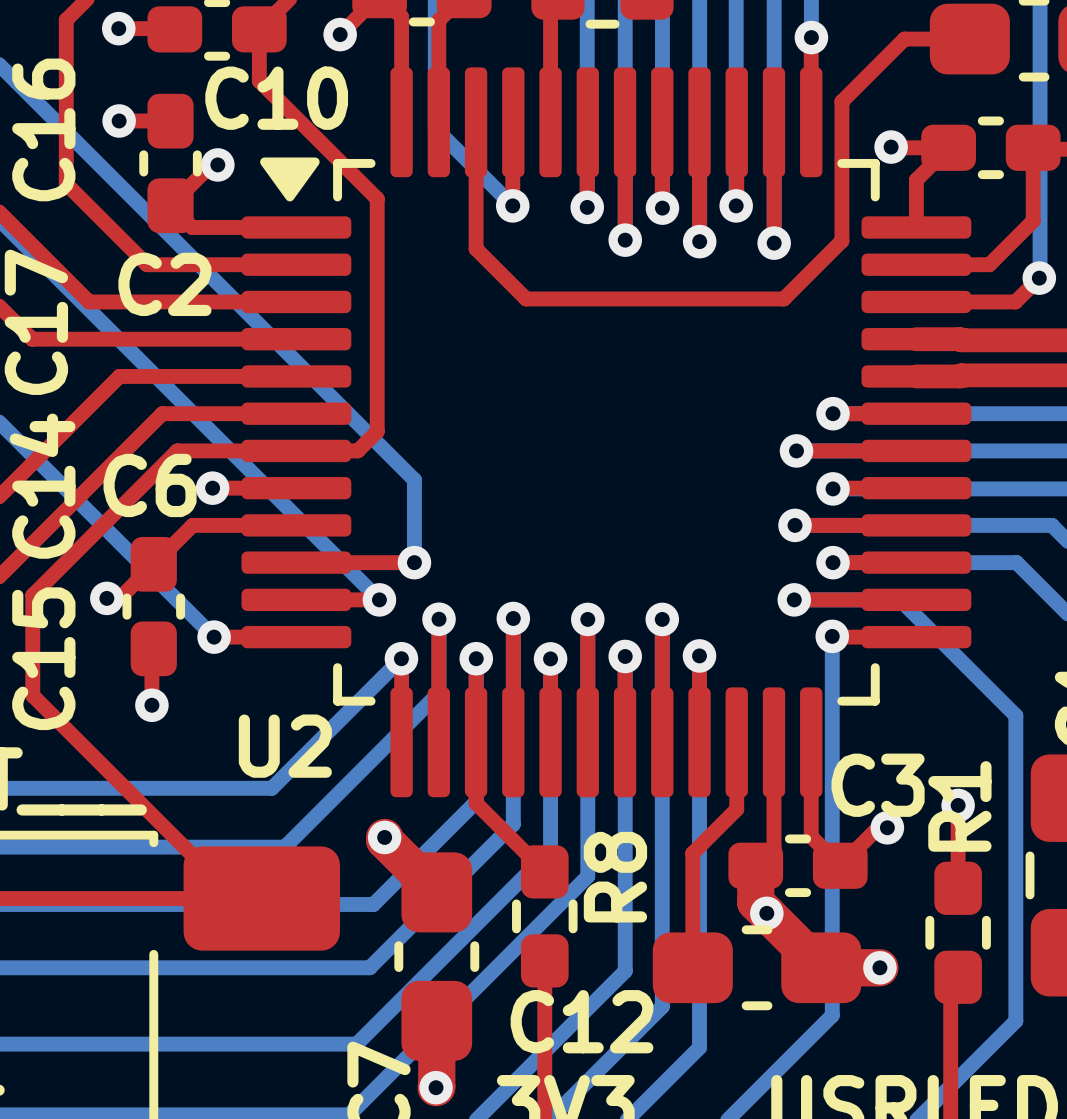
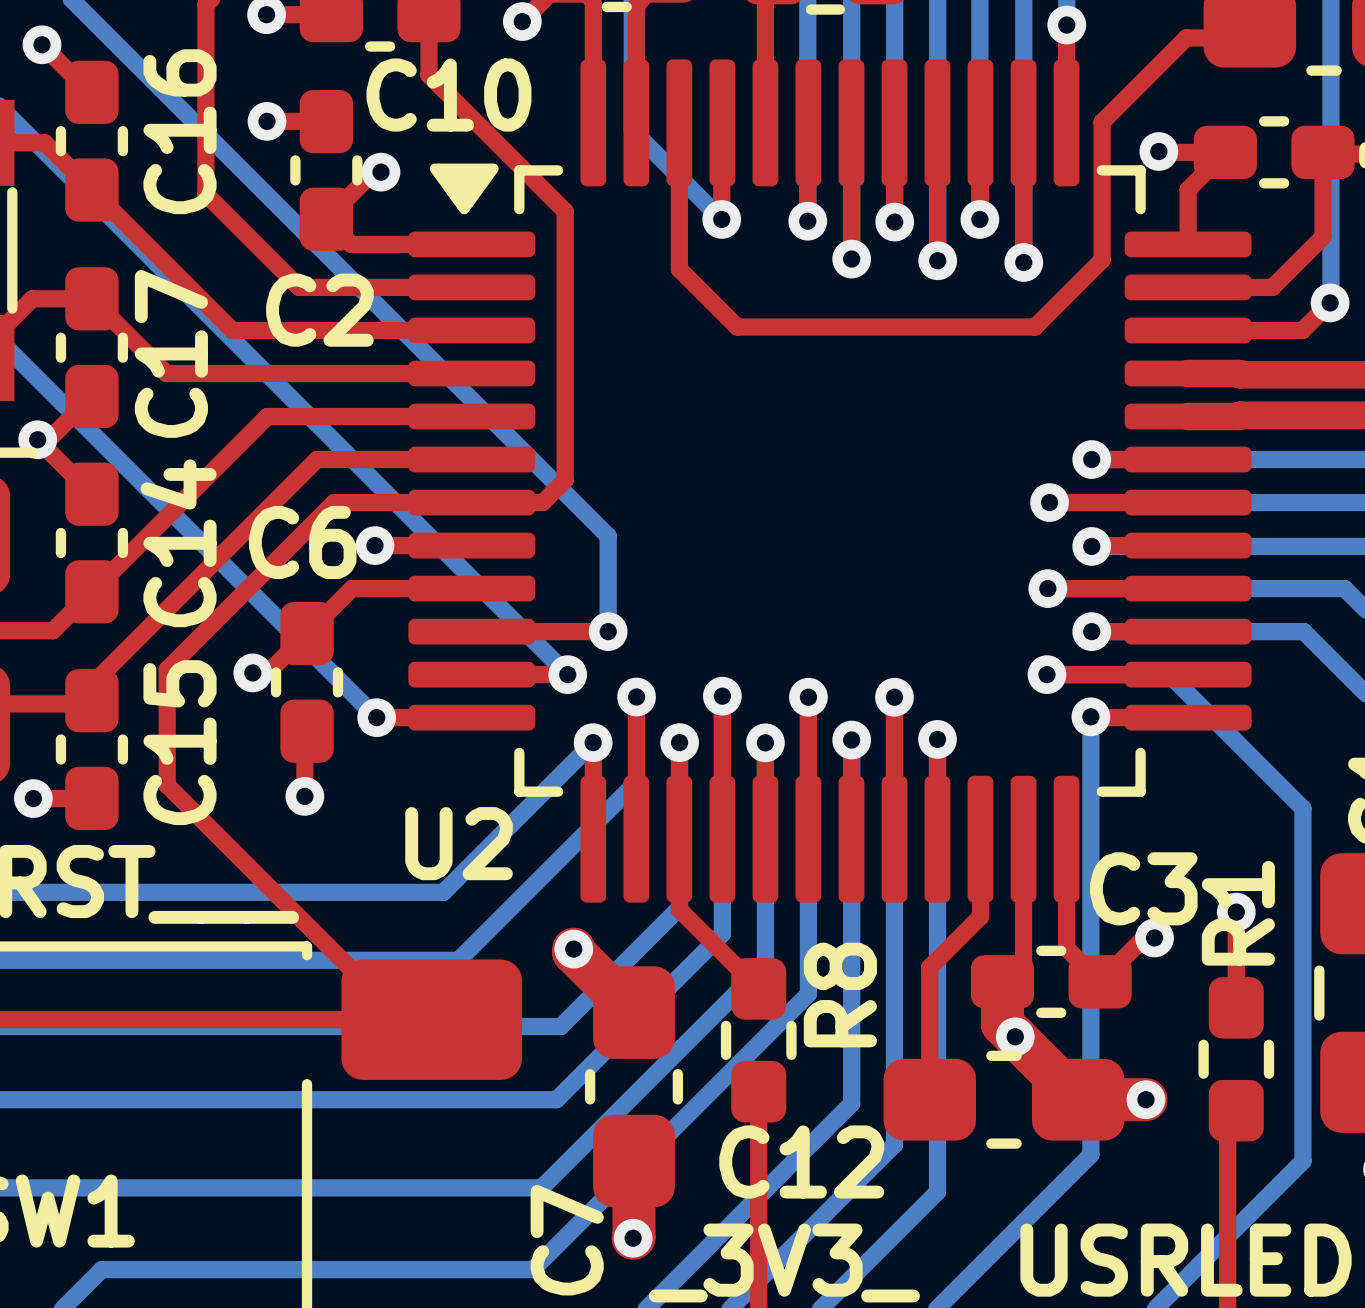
top track: (969, 39) (904, 39) (841, 101) (841, 121) -> (1248, 37) (1186, 37) (1102, 122)

